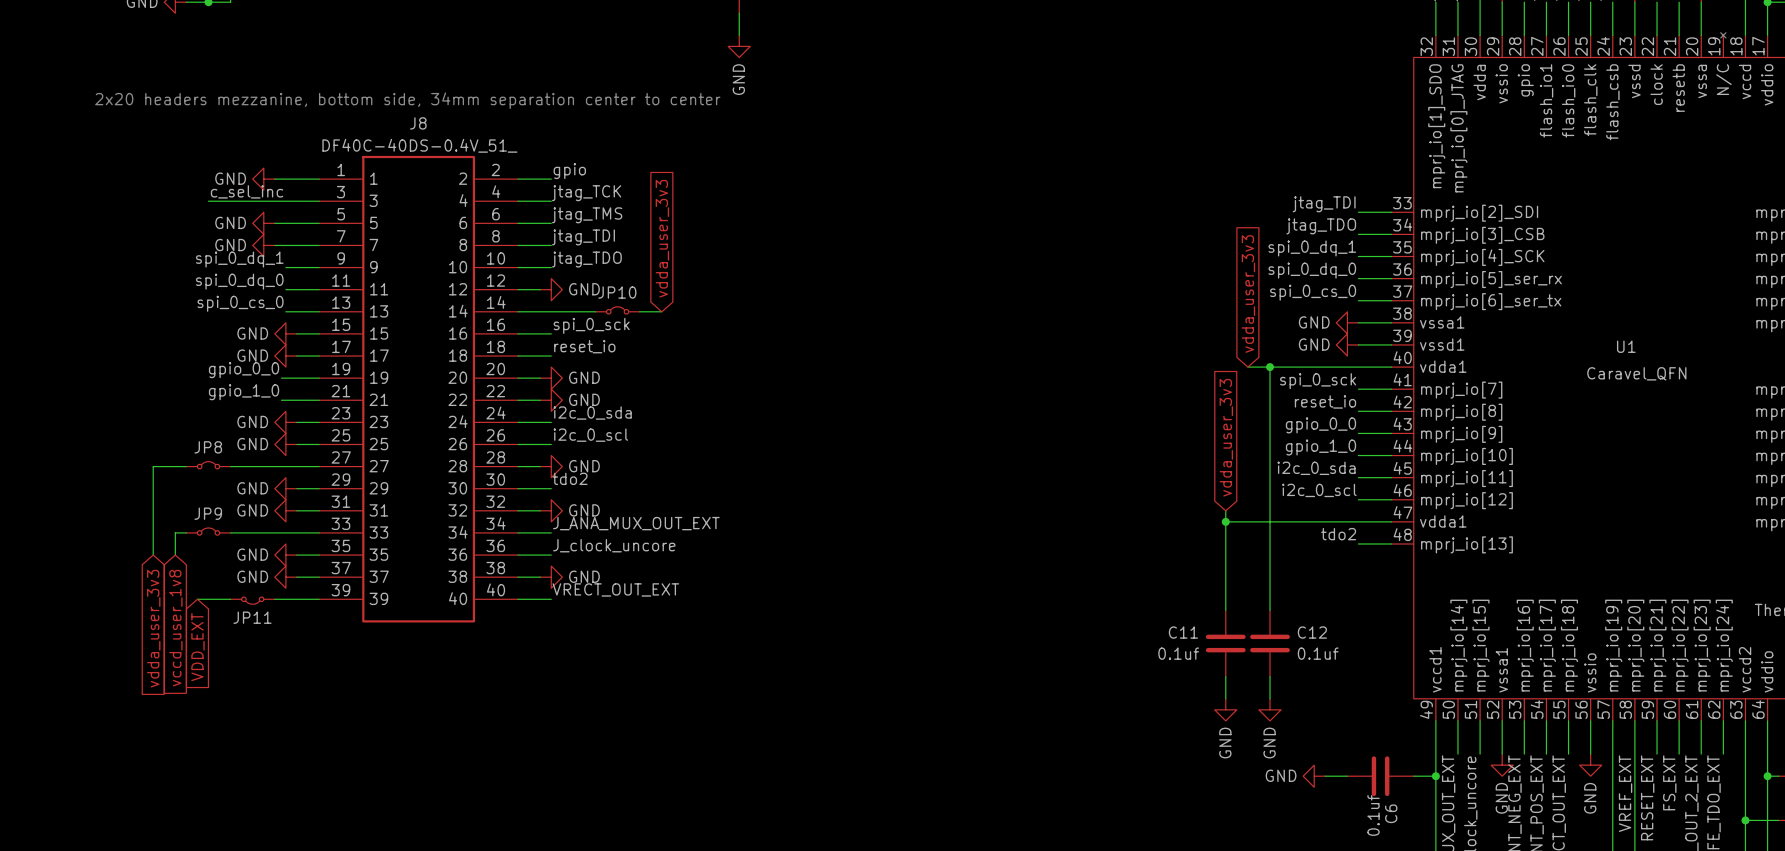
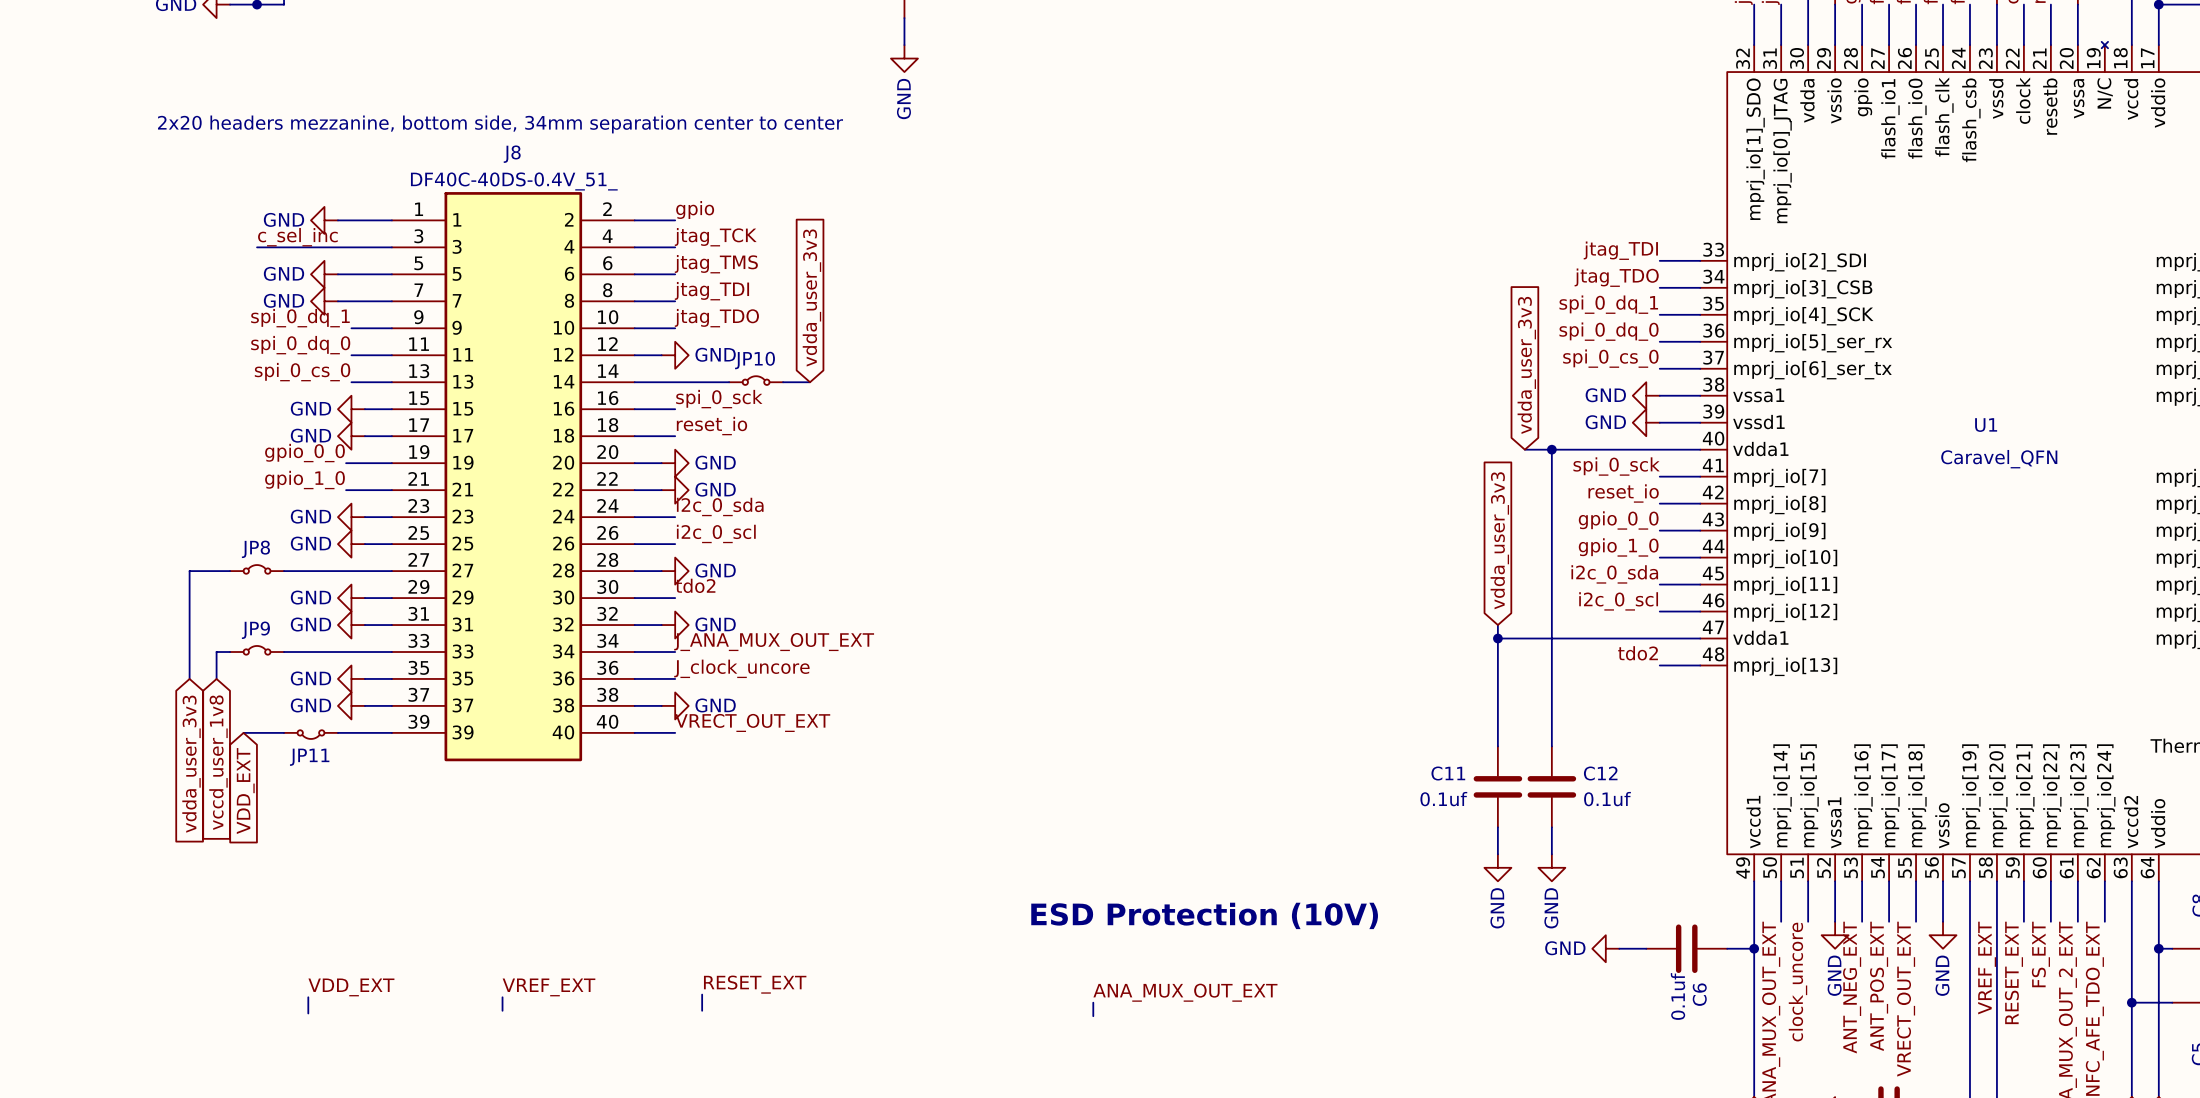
text: none -> ESD Protection (10V) (1204, 915)
label: none -> RESET_EXT (755, 984)
label: none -> VDD_EXT (351, 987)
label: none -> VREF_EXT (549, 987)
label: none -> ANA_MUX_OUT_EXT (1185, 992)
wire: none -> (702, 994) (702, 1010)
wire: none -> (308, 997) (308, 1013)
wire: none -> (502, 997) (502, 1010)
wire: none -> (1093, 1002) (1093, 1016)

